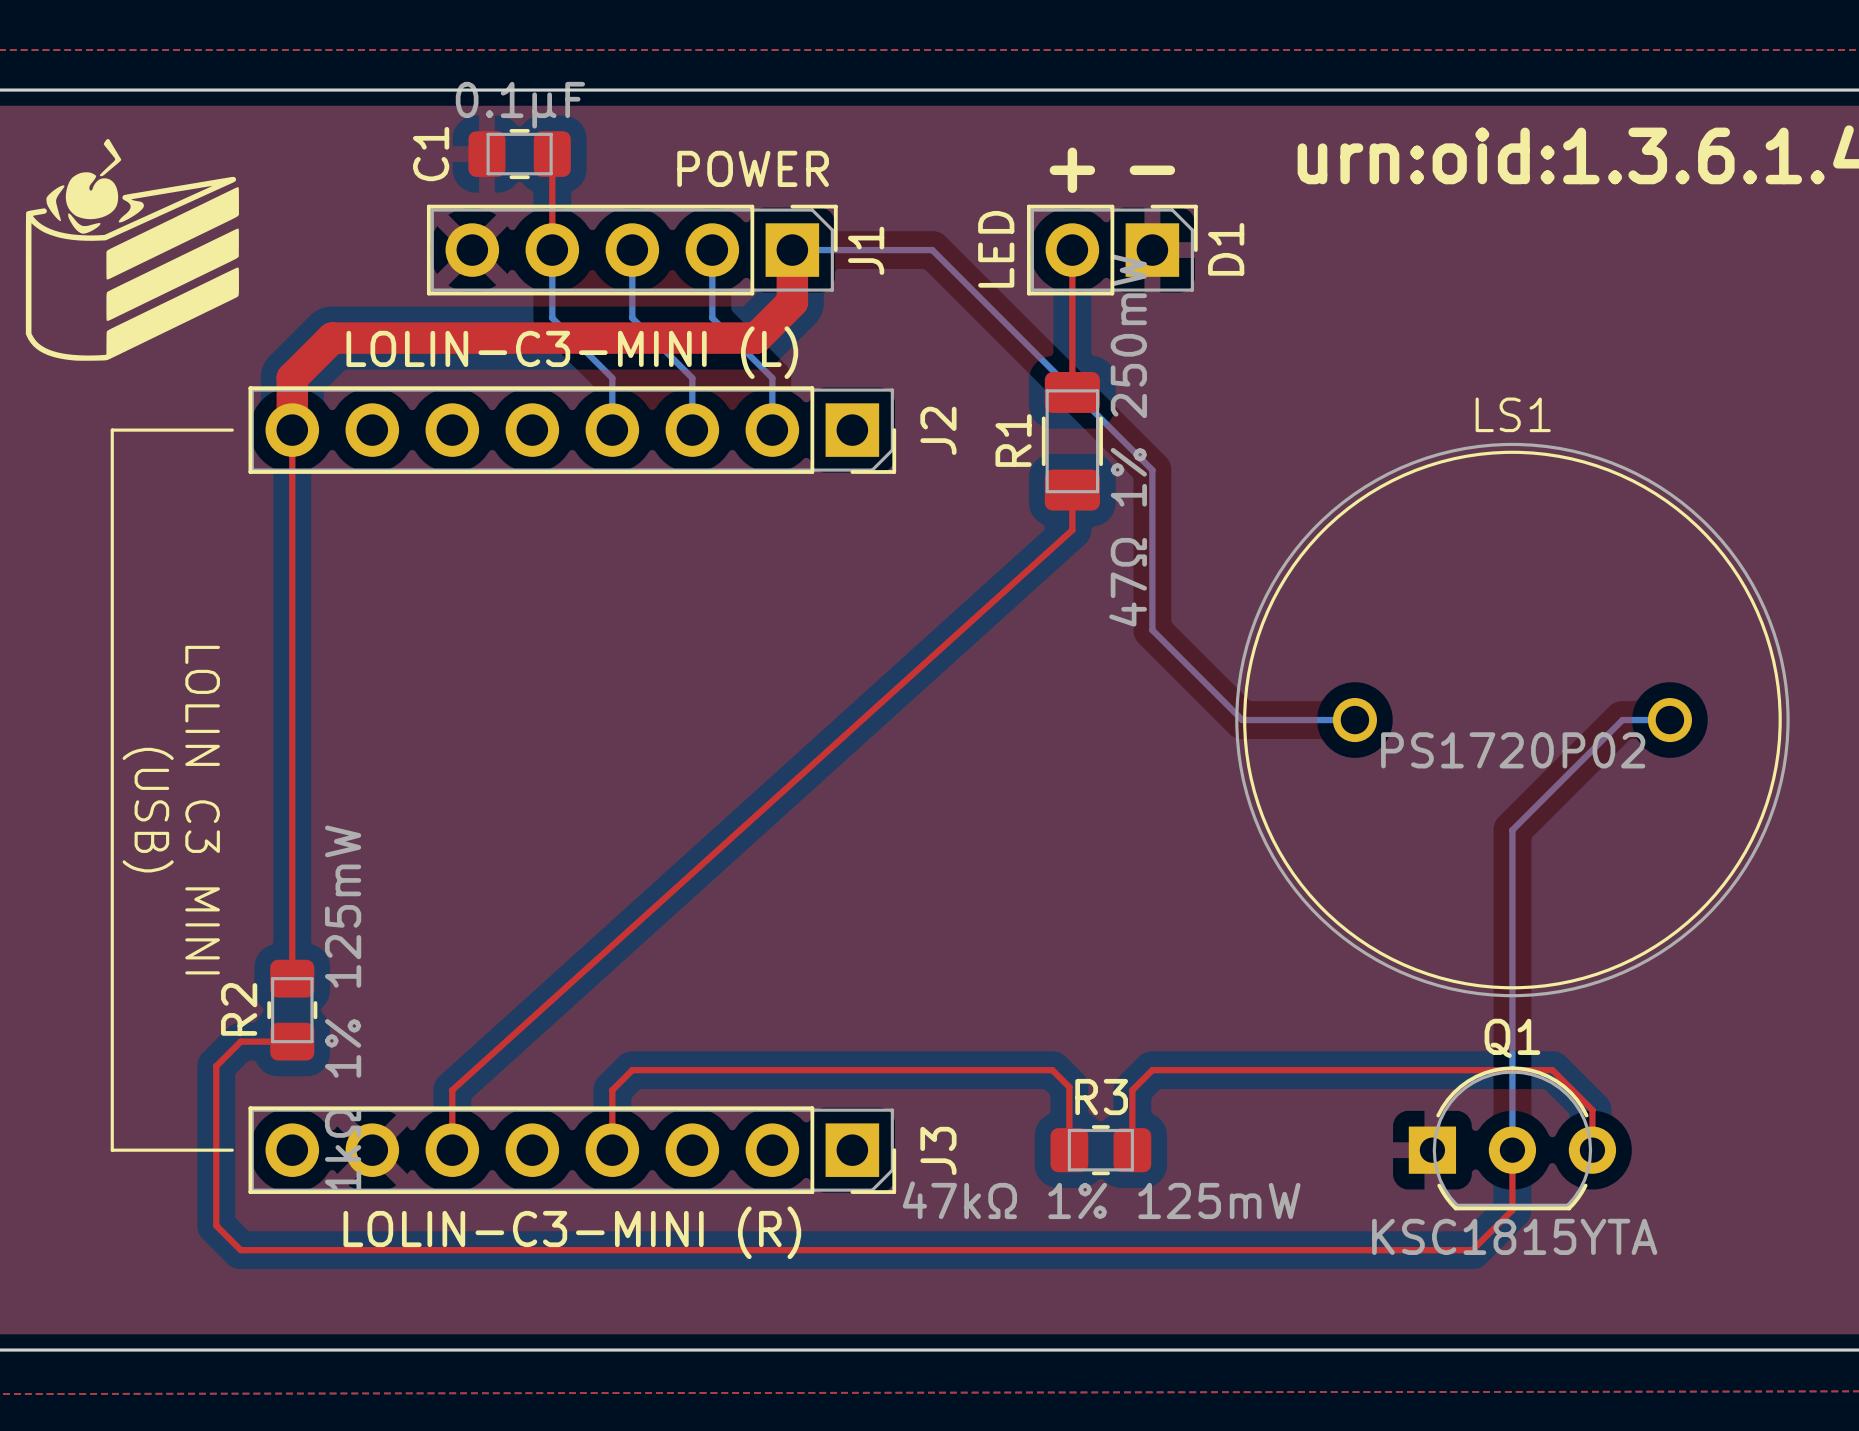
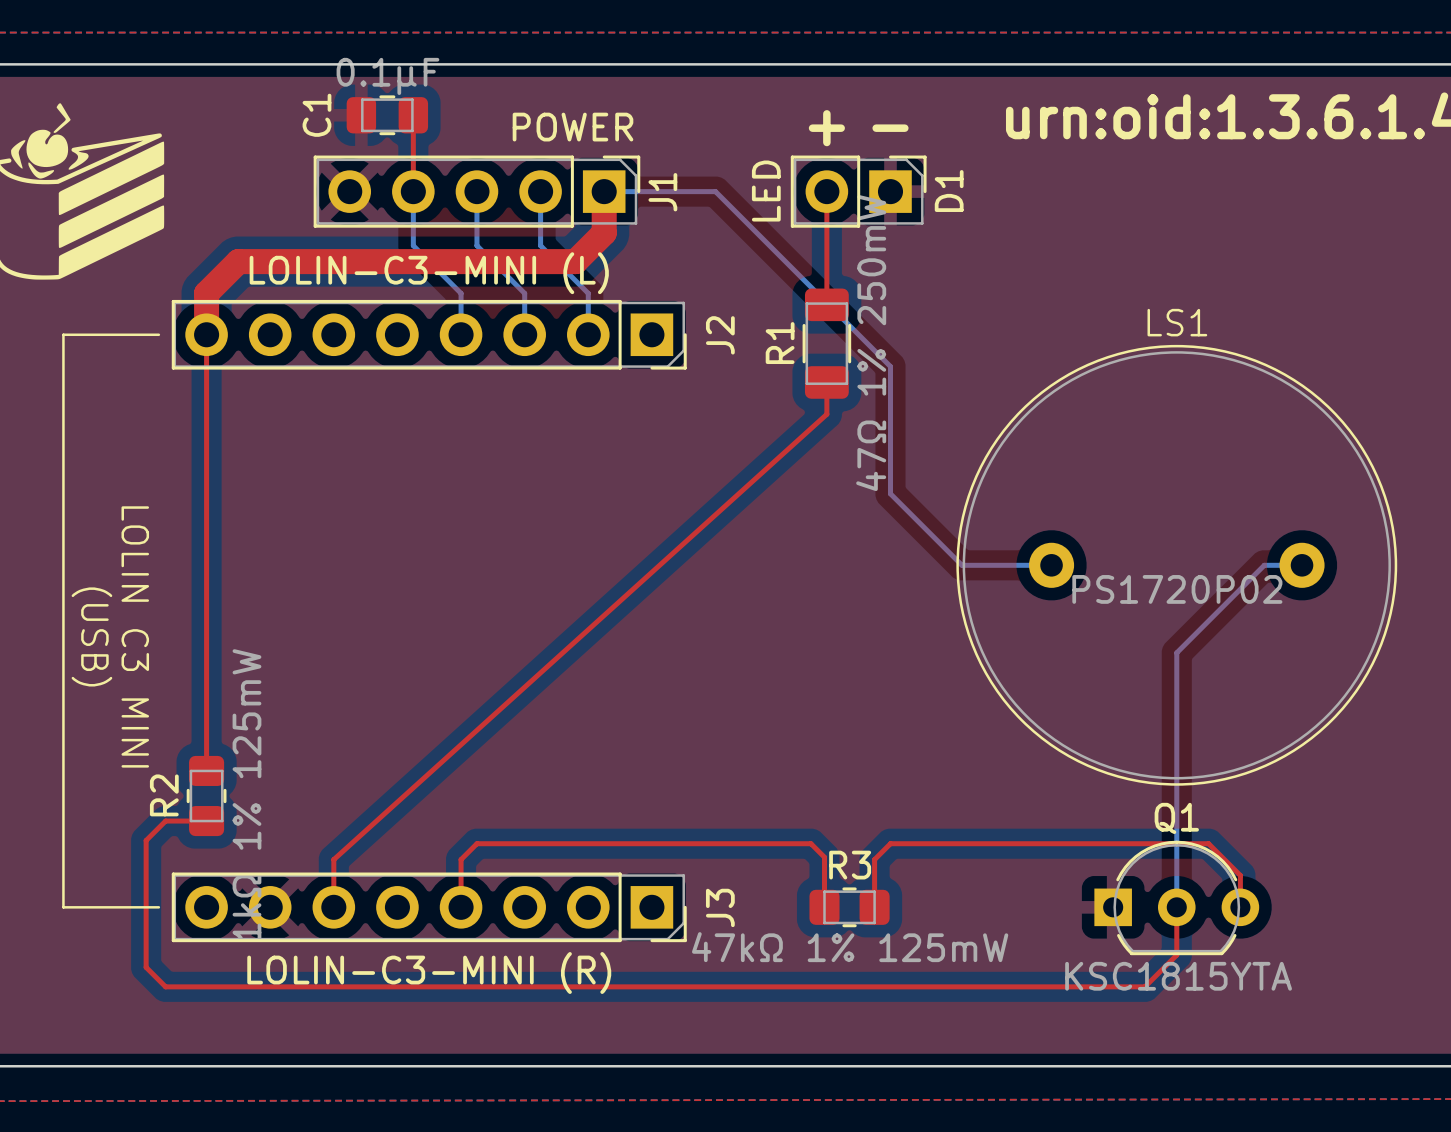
LS1 footprint: [1235, 442, 1790, 998] -> [956, 344, 1398, 786]

